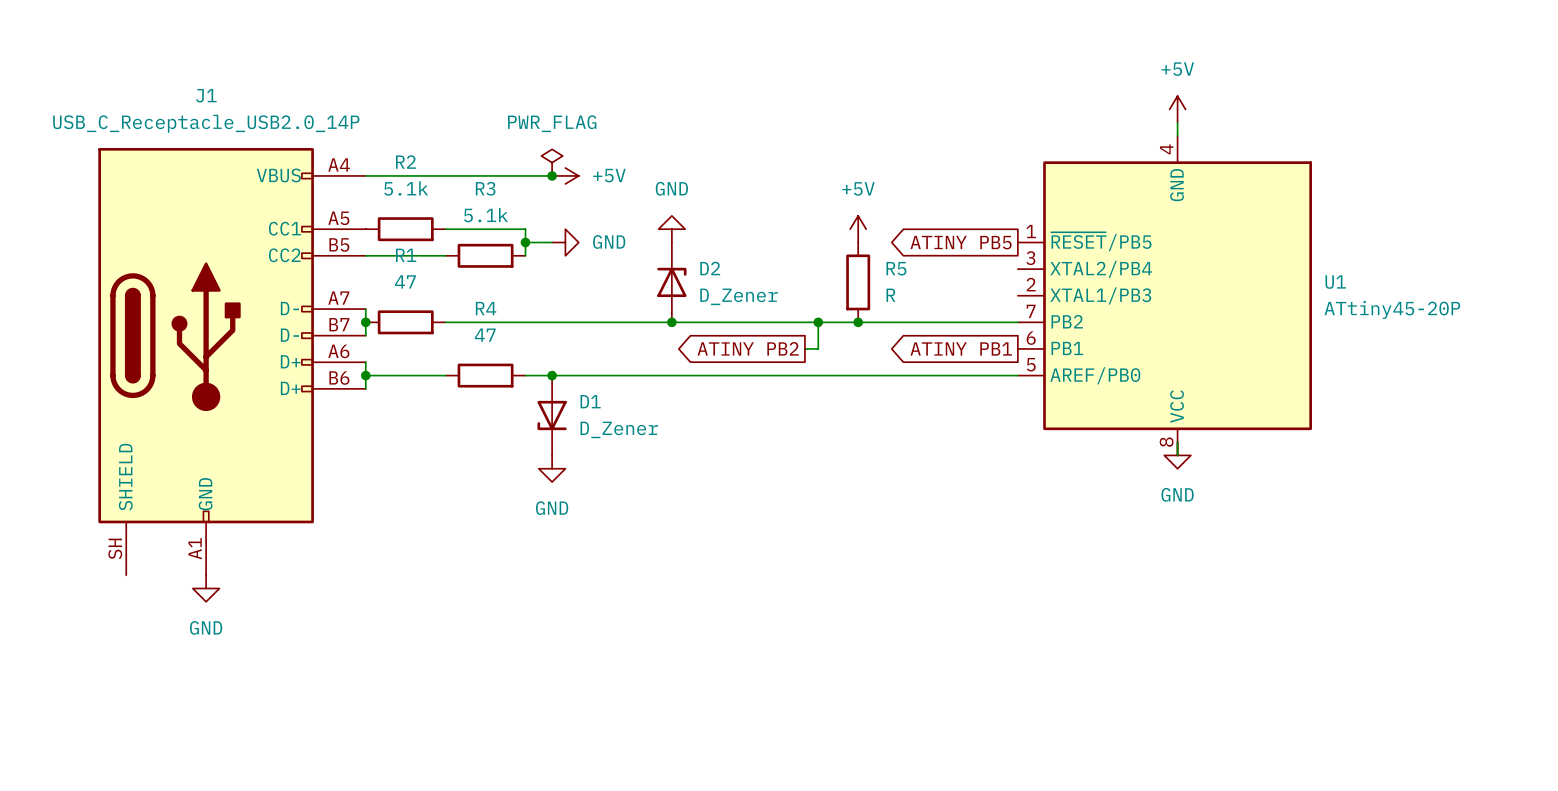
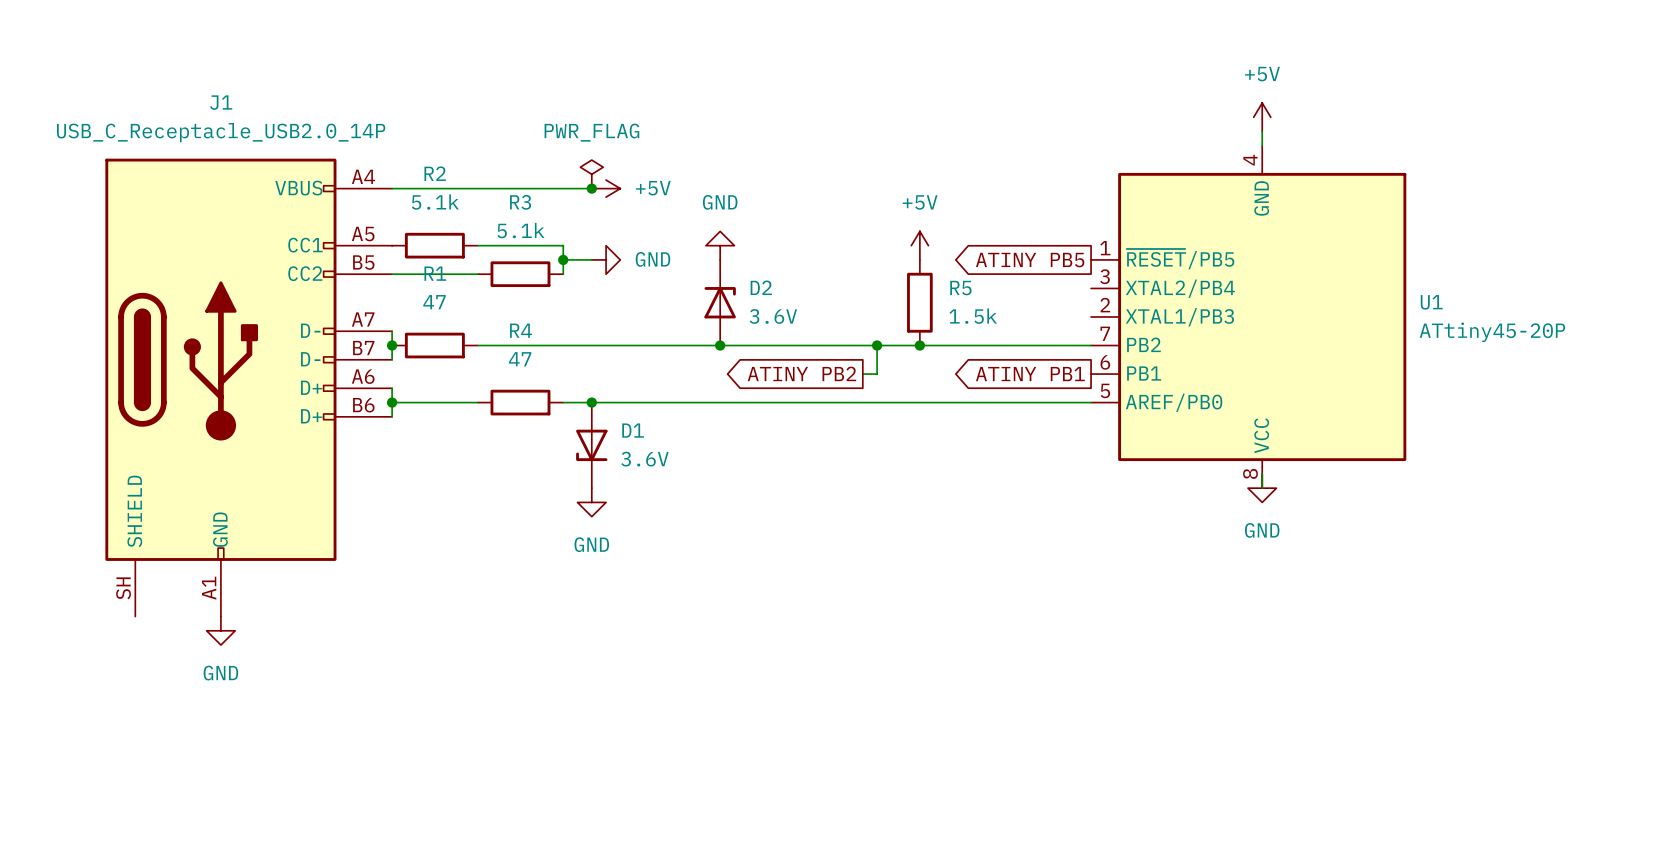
R5 value: R (890, 295) -> 1.5k (973, 316)
D2 value: D_Zener (739, 296) -> 3.6V (773, 316)
D1 value: D_Zener (619, 429) -> 3.6V (644, 459)

